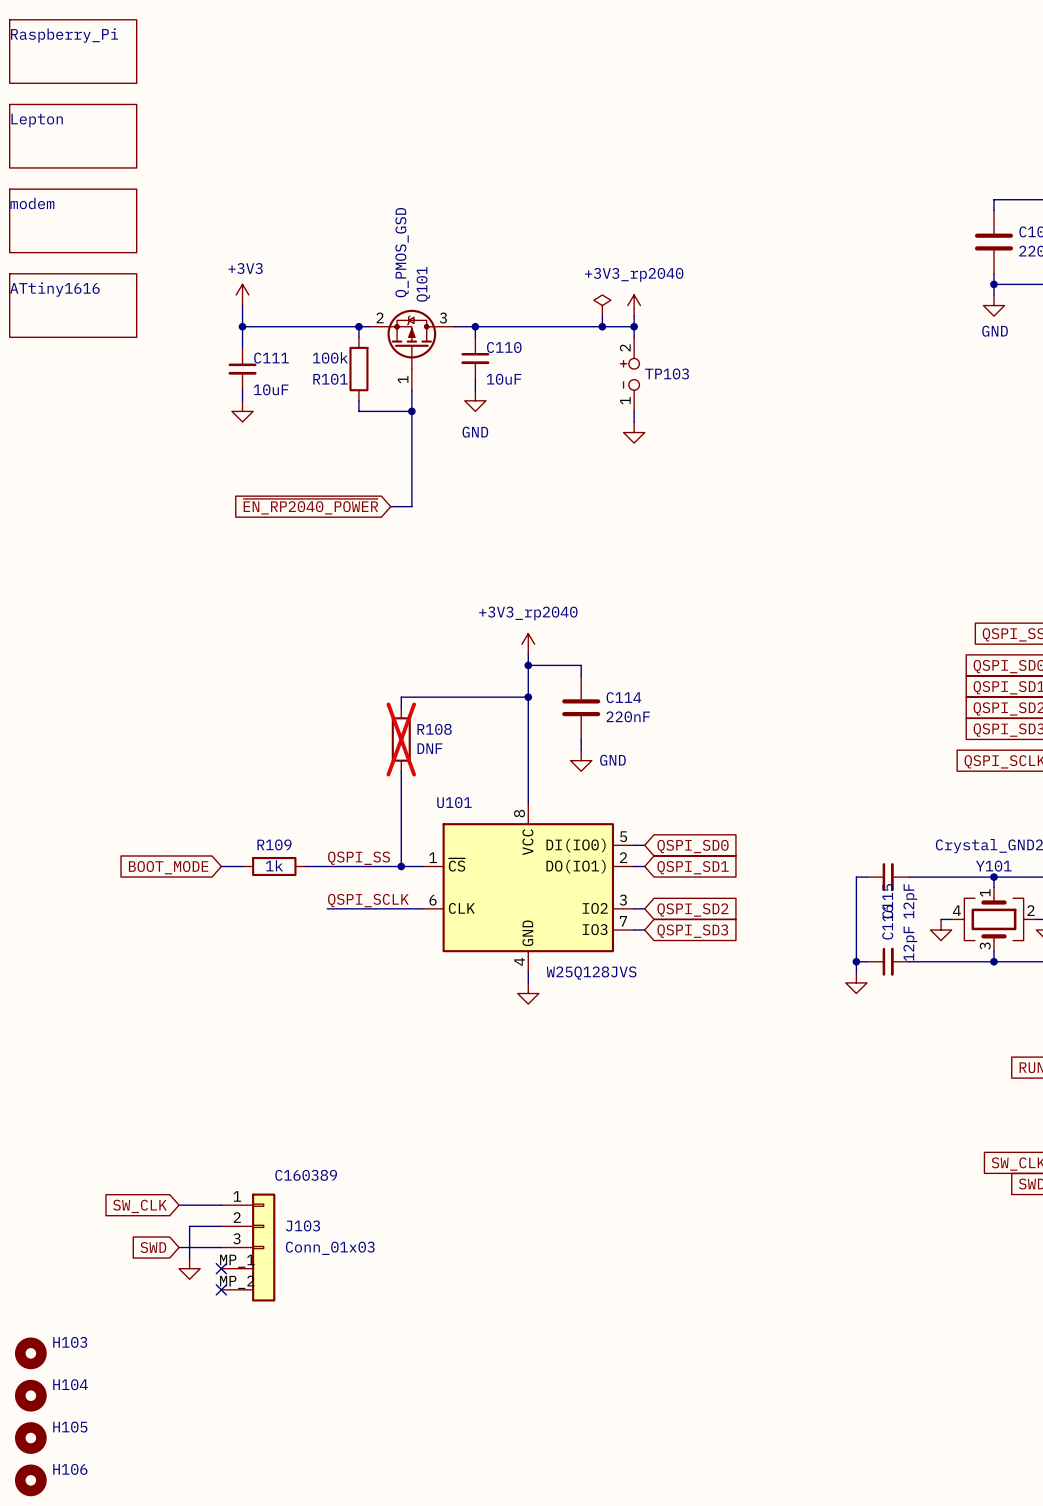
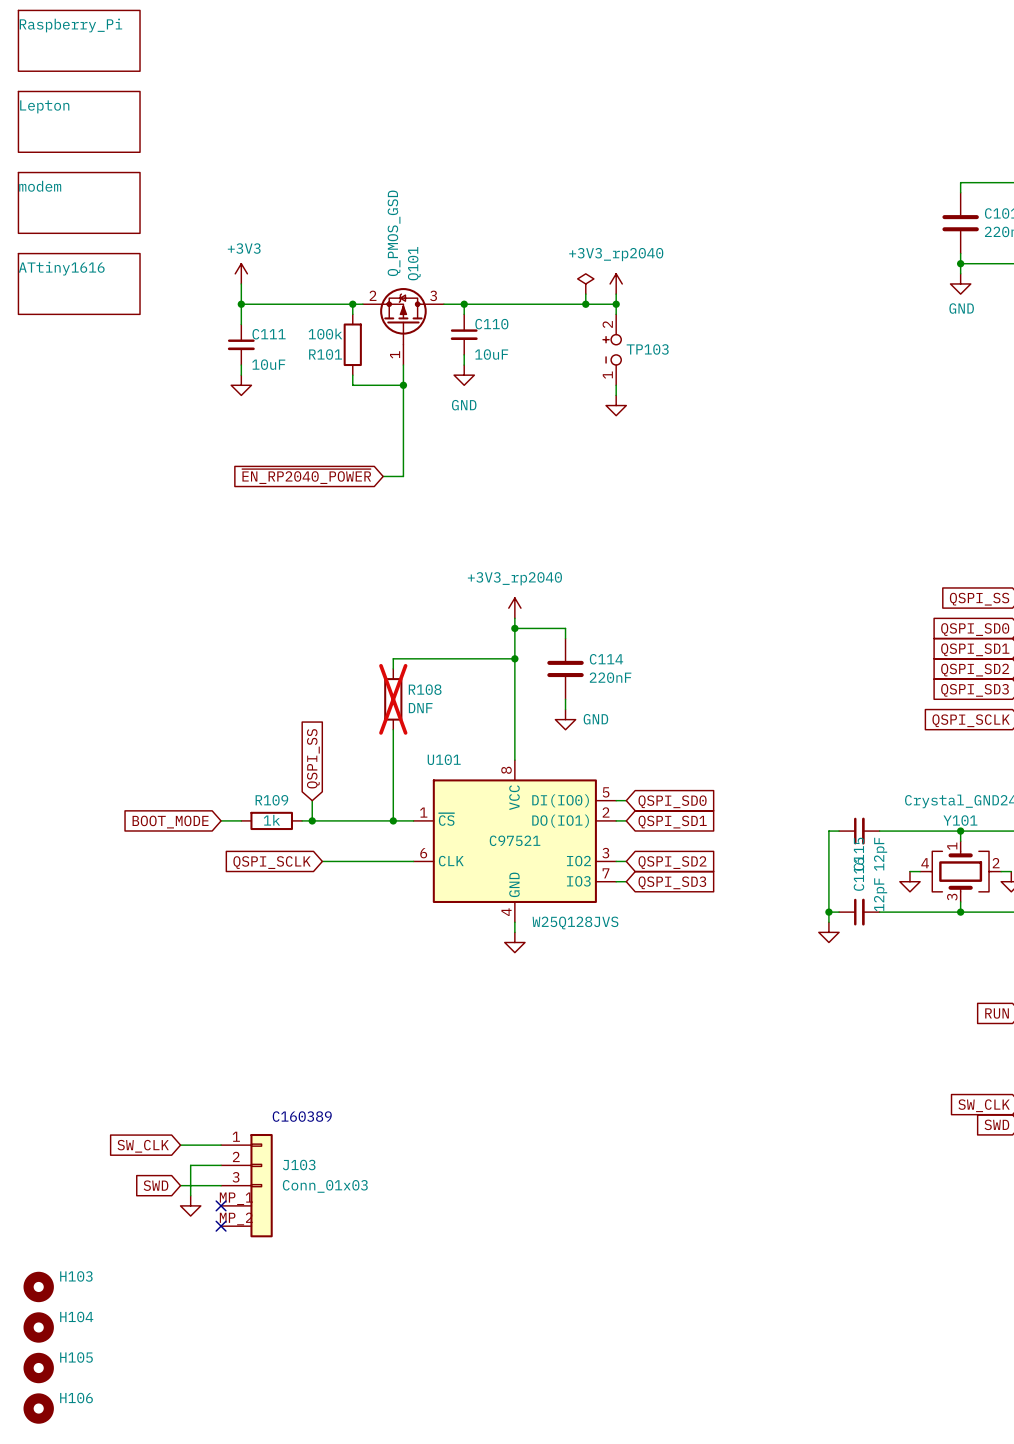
global label: none -> QSPI_SS (313, 758)
wire: none -> (312, 800) (312, 820)
label: QSPI_SS (359, 858) -> none
junction: none -> (312, 820)
U101 text: none -> C97521 (515, 840)
label: QSPI_SCLK (368, 900) -> none
global label: none -> QSPI_SCLK (272, 862)

